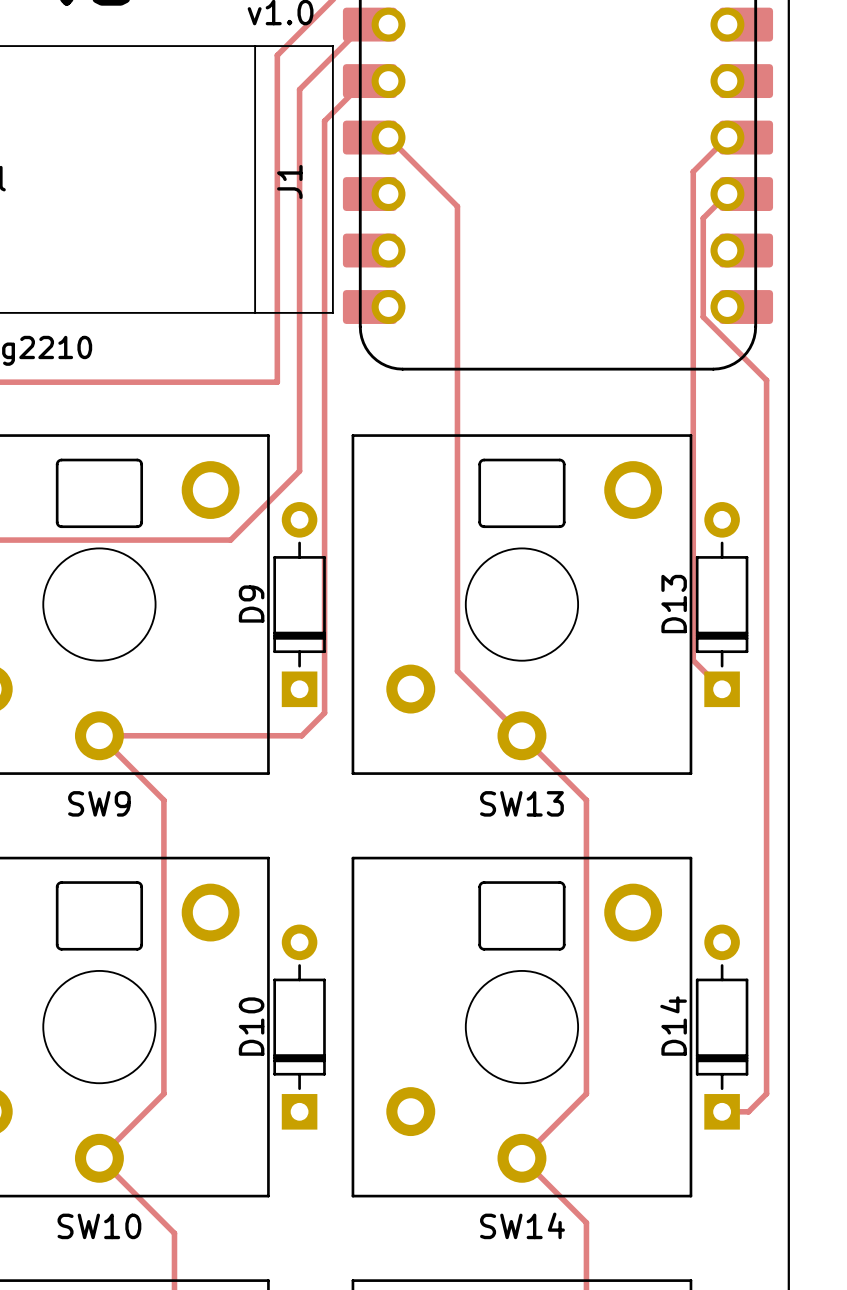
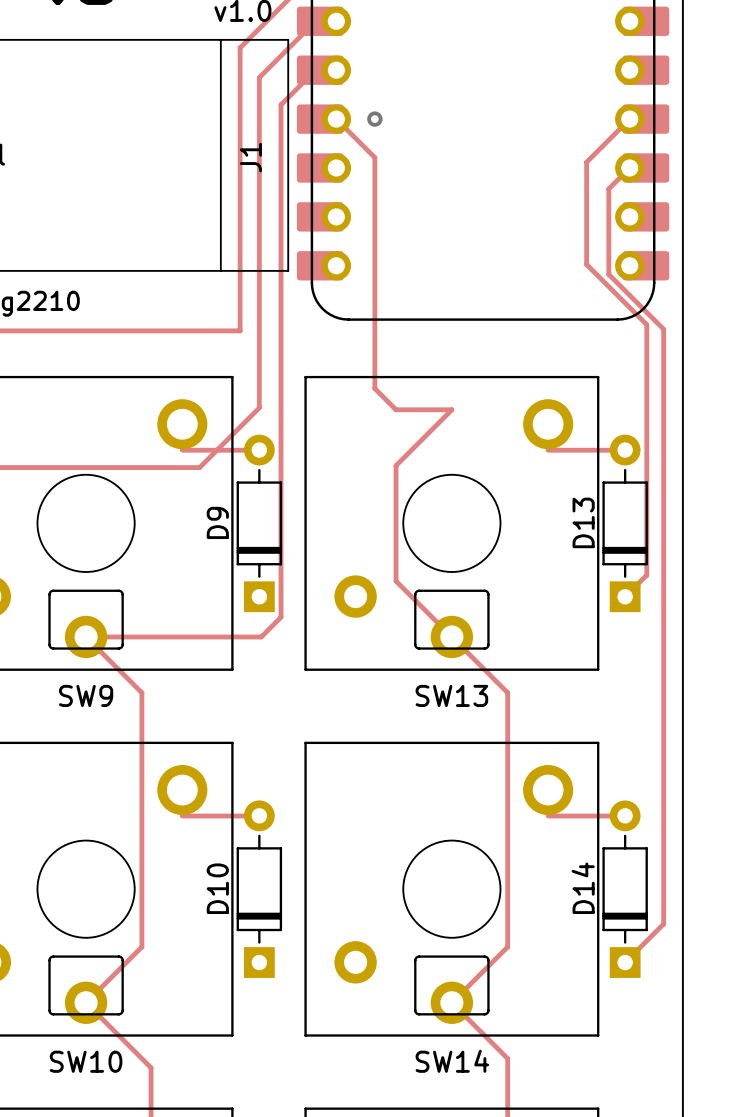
via: none -> (374, 119)
track: (693, 171) (693, 660) (722, 689) -> (600, 148) (586, 162) (586, 264) (646, 324) (646, 575) (625, 596)
track: (433, 182) (457, 206) (457, 537) -> (374, 157) (374, 388) (396, 409) (451, 409) (396, 465)
part: (99, 493) -> none
part: (521, 493) -> none
track: none -> (182, 450) (259, 450)
track: none -> (548, 450) (624, 450)
part: none -> (86, 619)
part: none -> (451, 619)
part: (99, 915) -> none
part: (521, 915) -> none
track: none -> (182, 816) (259, 816)
track: none -> (548, 816) (624, 816)
track: (766, 1067) (766, 1093) (748, 1111) (722, 1111) -> (663, 924) (625, 962)
part: none -> (86, 985)
part: none -> (451, 985)

